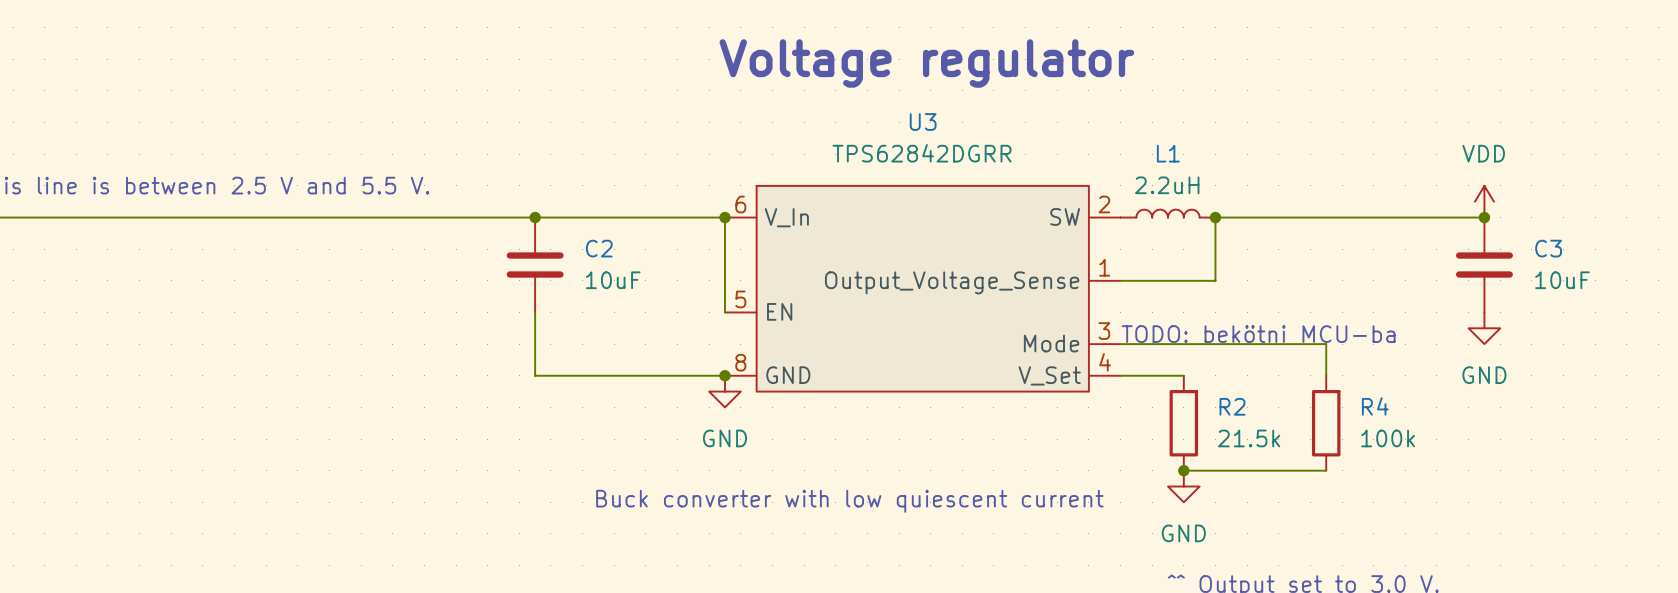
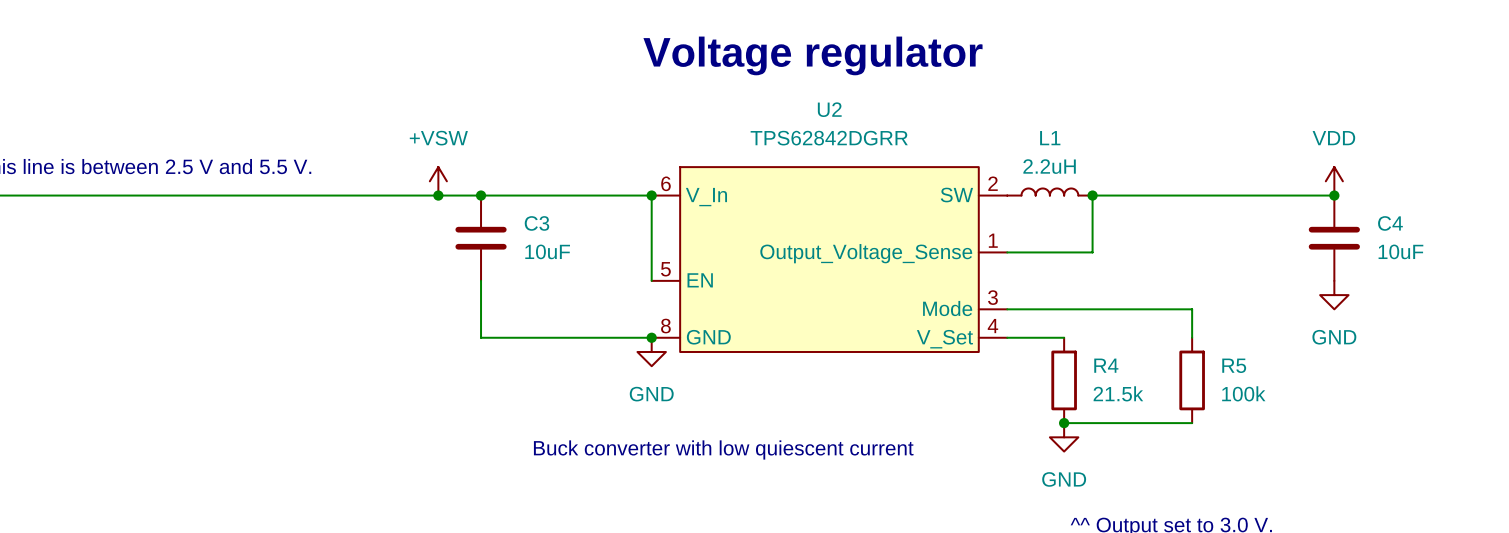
U3 name: U3 (923, 122) -> U2 (829, 109)
power symbol: none -> +VSW (438, 181)
junction: none -> (438, 195)
C2 name: C2 (599, 248) -> C3 (536, 223)
C3 name: C3 (1548, 248) -> C4 (1390, 223)
text: TODO: bekötni MCU-ba (1258, 334) -> none
R2 name: R2 (1232, 406) -> R4 (1106, 365)
R4 name: R4 (1375, 406) -> R5 (1234, 365)

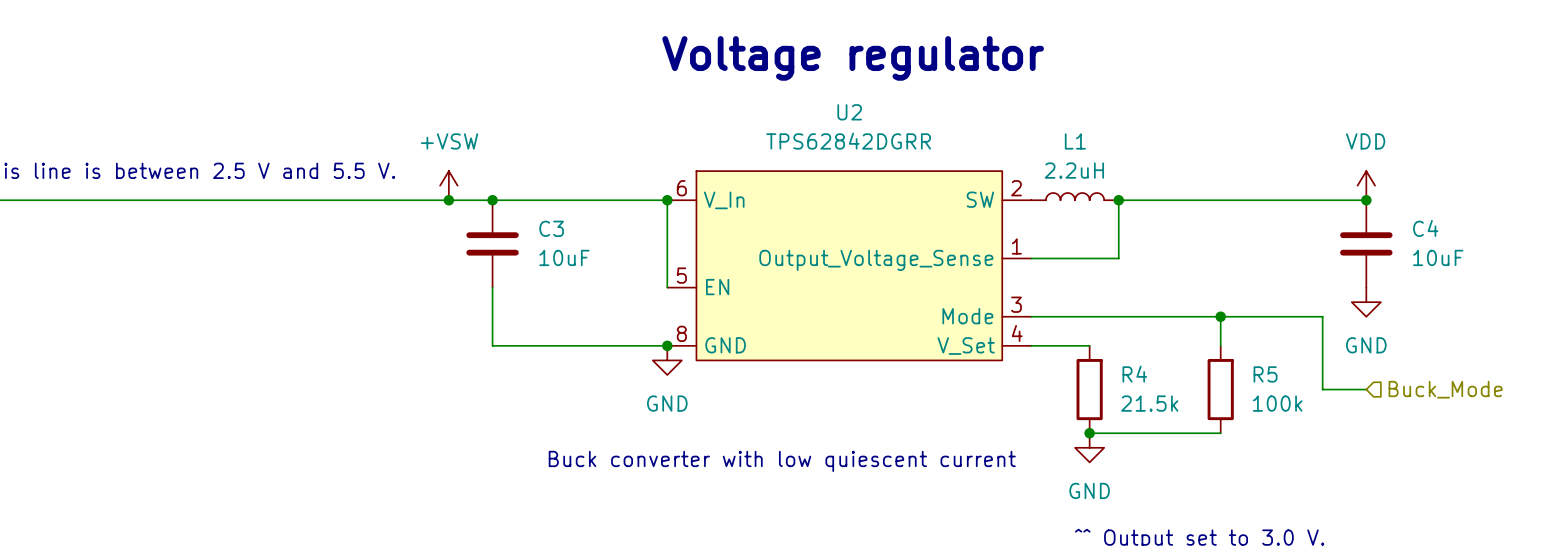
wire: none -> (1220, 316) (1322, 316) (1322, 389) (1366, 389)
junction: none -> (1220, 316)
hierarchical label: none -> Buck_Mode (1445, 389)

